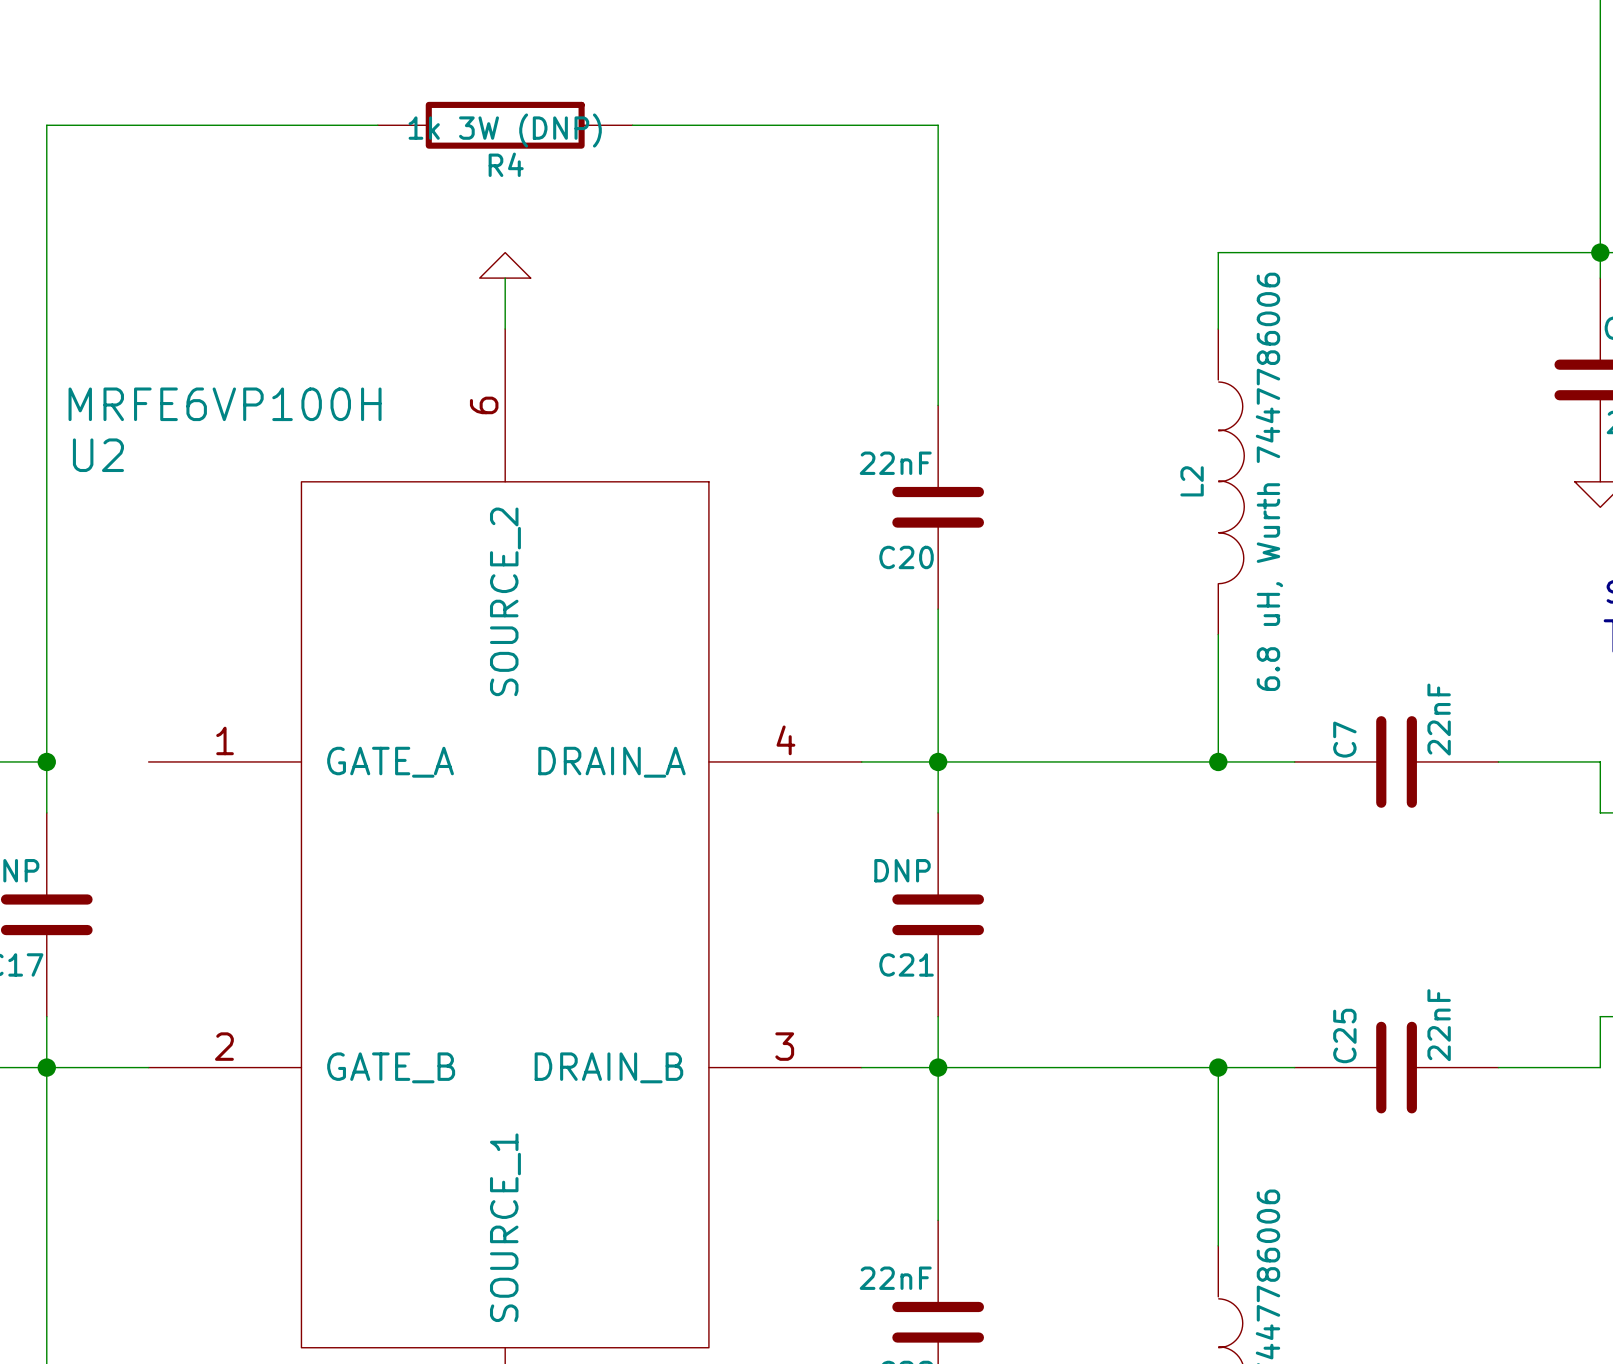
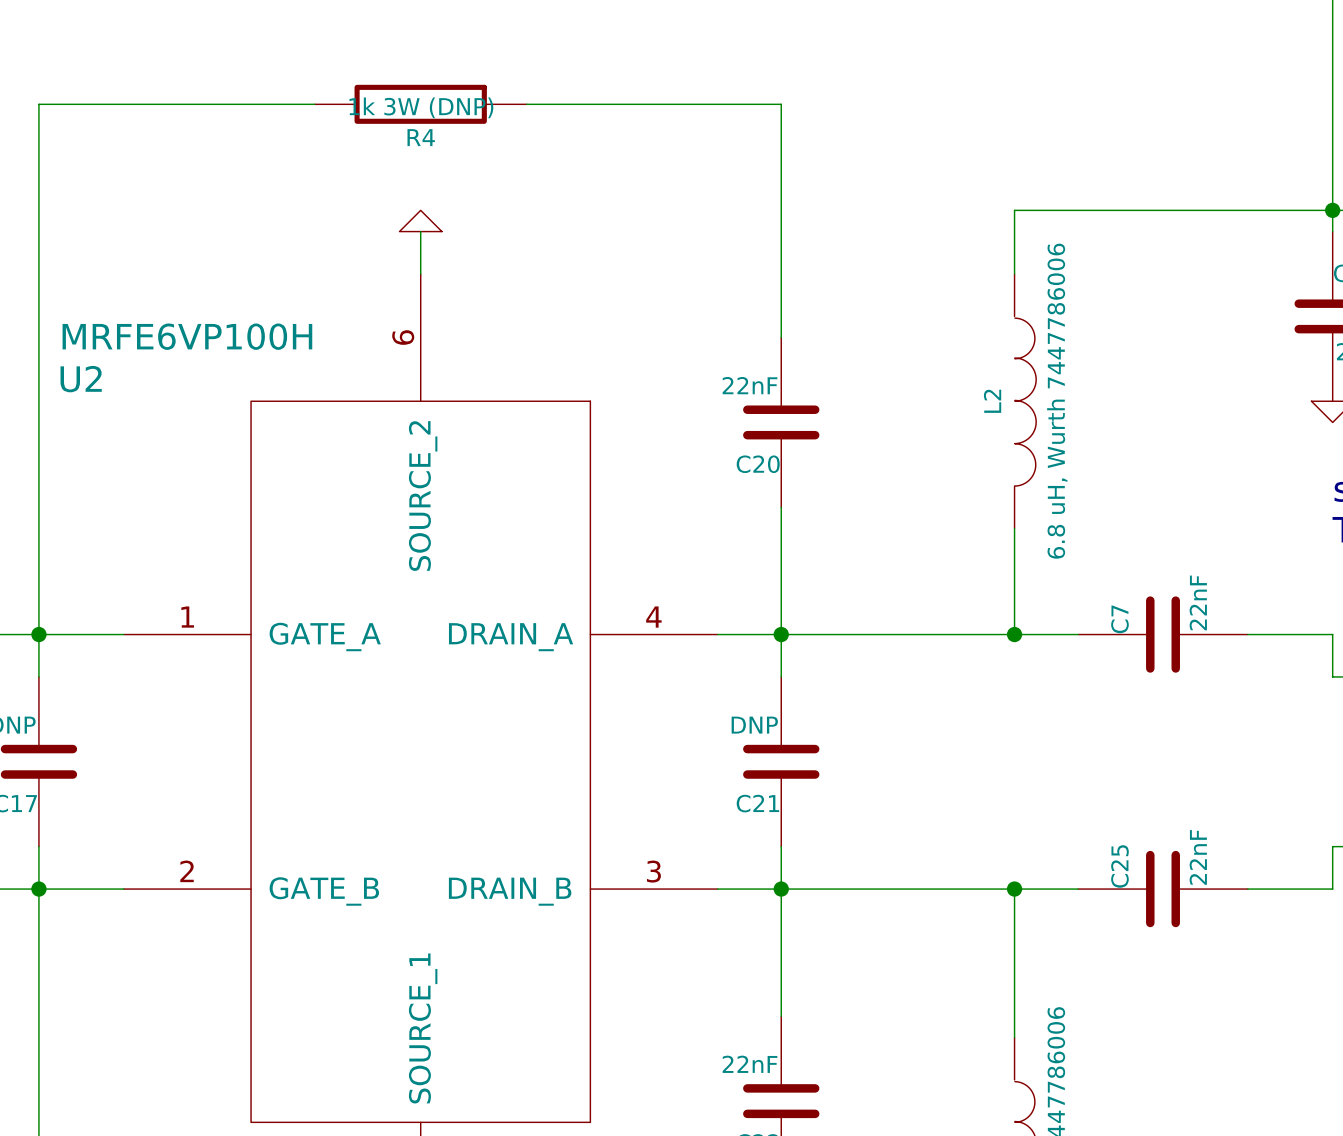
wire: none -> (38, 634) (123, 634)

